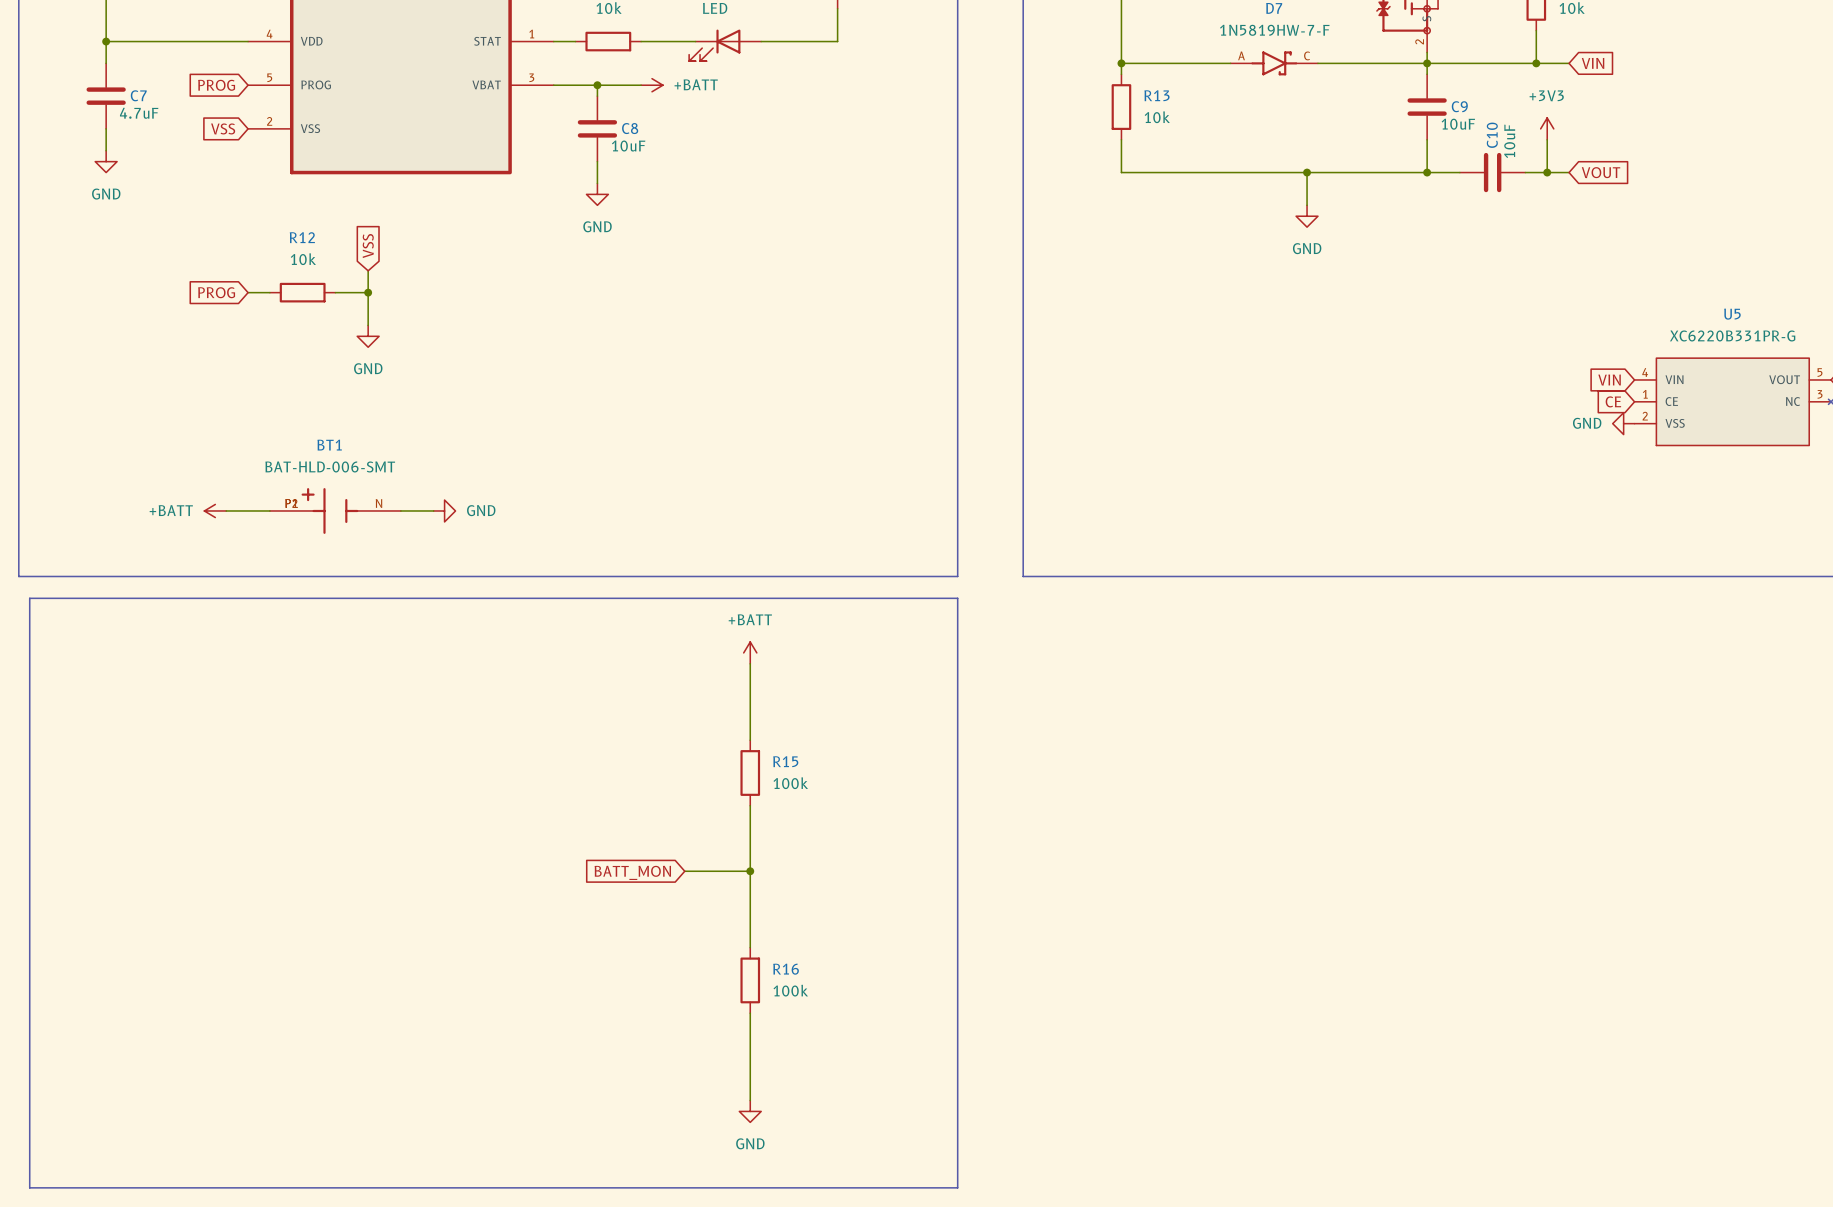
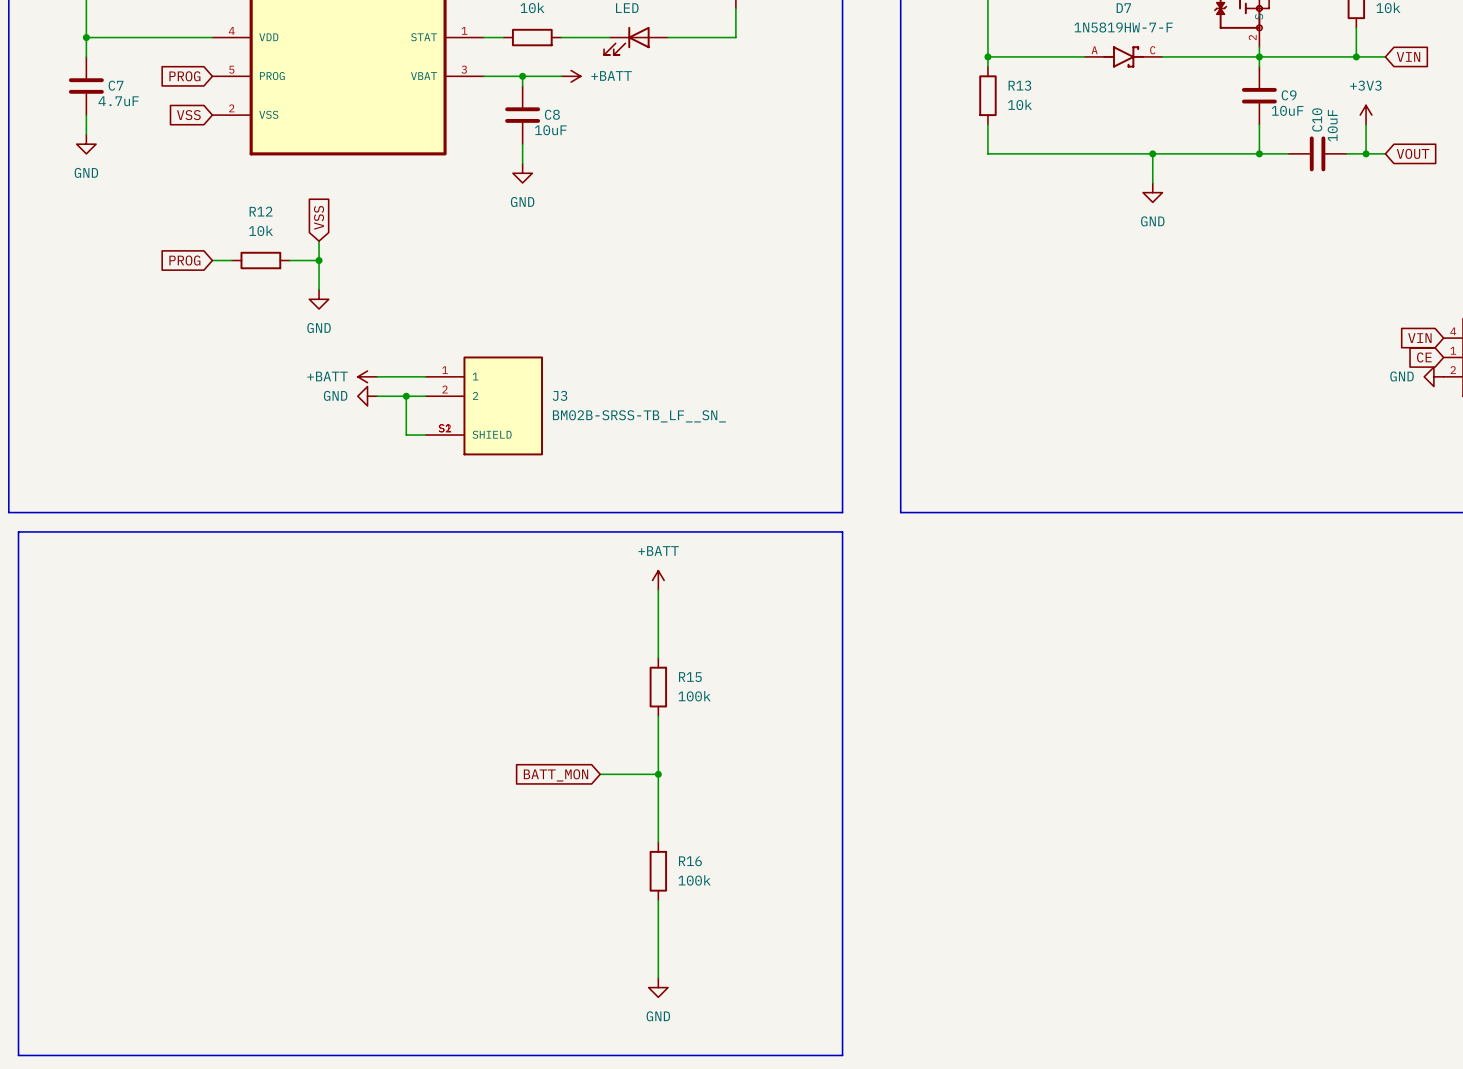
power symbol: none -> +BATT (367, 376)
wire: none -> (377, 376) (425, 376)
wire: none -> (377, 396) (425, 396)
wire: none -> (406, 396) (406, 435) (425, 435)
junction: none -> (406, 396)
J3: none -> BM02B-SRSS-TB_LF__SN_ (484, 405)
power symbol: +BATT (215, 510) -> none
wire: (226, 510) (269, 510) -> none
BT1: BAT-HLD-006-SMT (335, 510) -> none
wire: (400, 510) (433, 510) -> none
power symbol rotation: 0° (444, 510) -> 180° (367, 396)
power symbol position: GND (444, 510) -> GND (367, 396)

